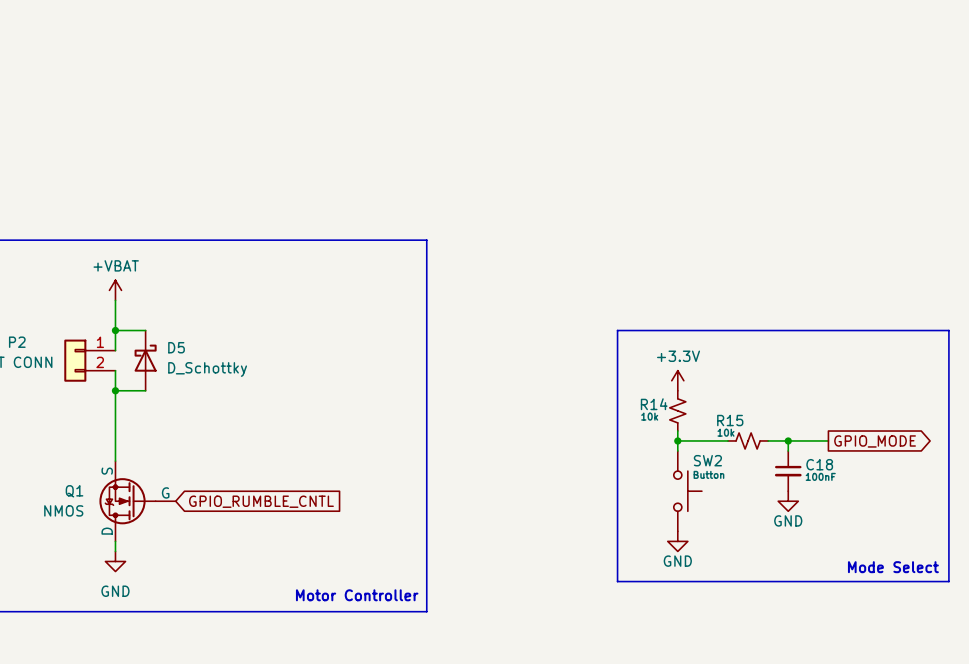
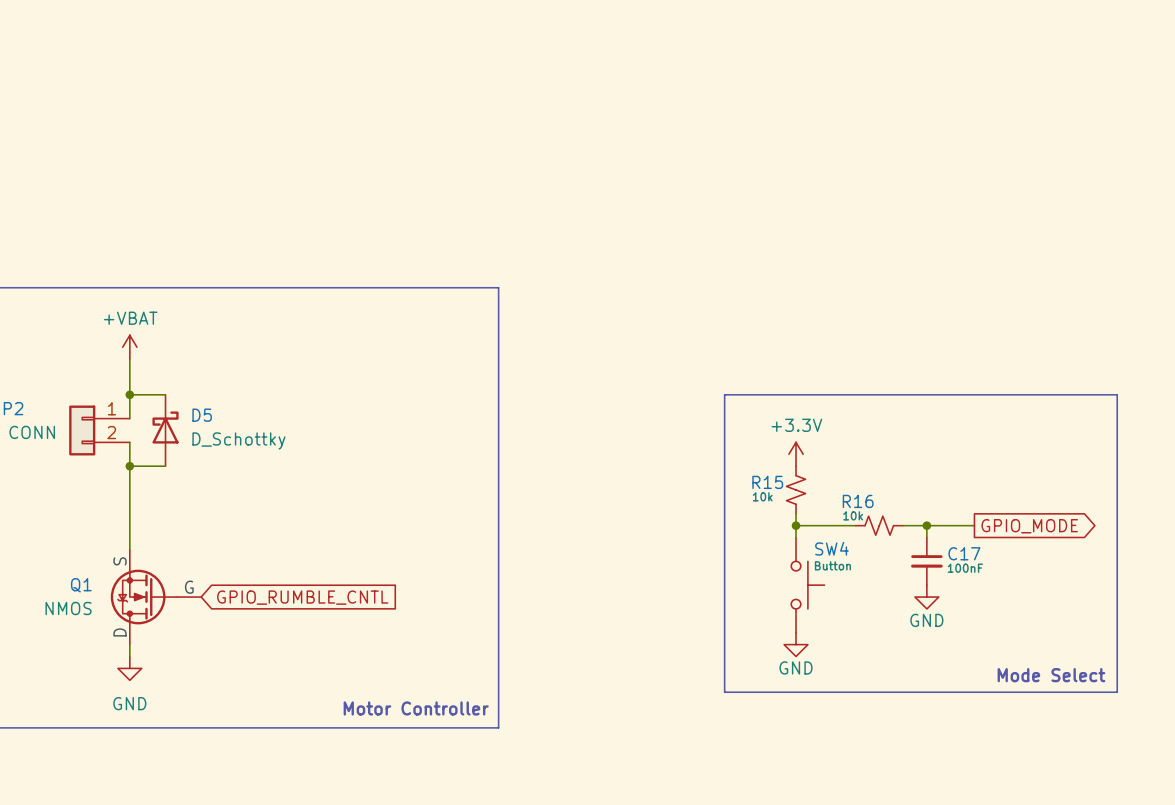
R14 name: R14 (654, 404) -> R15 (767, 482)
R15 name: R15 (730, 420) -> R16 (858, 501)
SW2 name: SW2 (707, 460) -> SW4 (831, 548)
C18 name: C18 (819, 464) -> C17 (964, 553)

